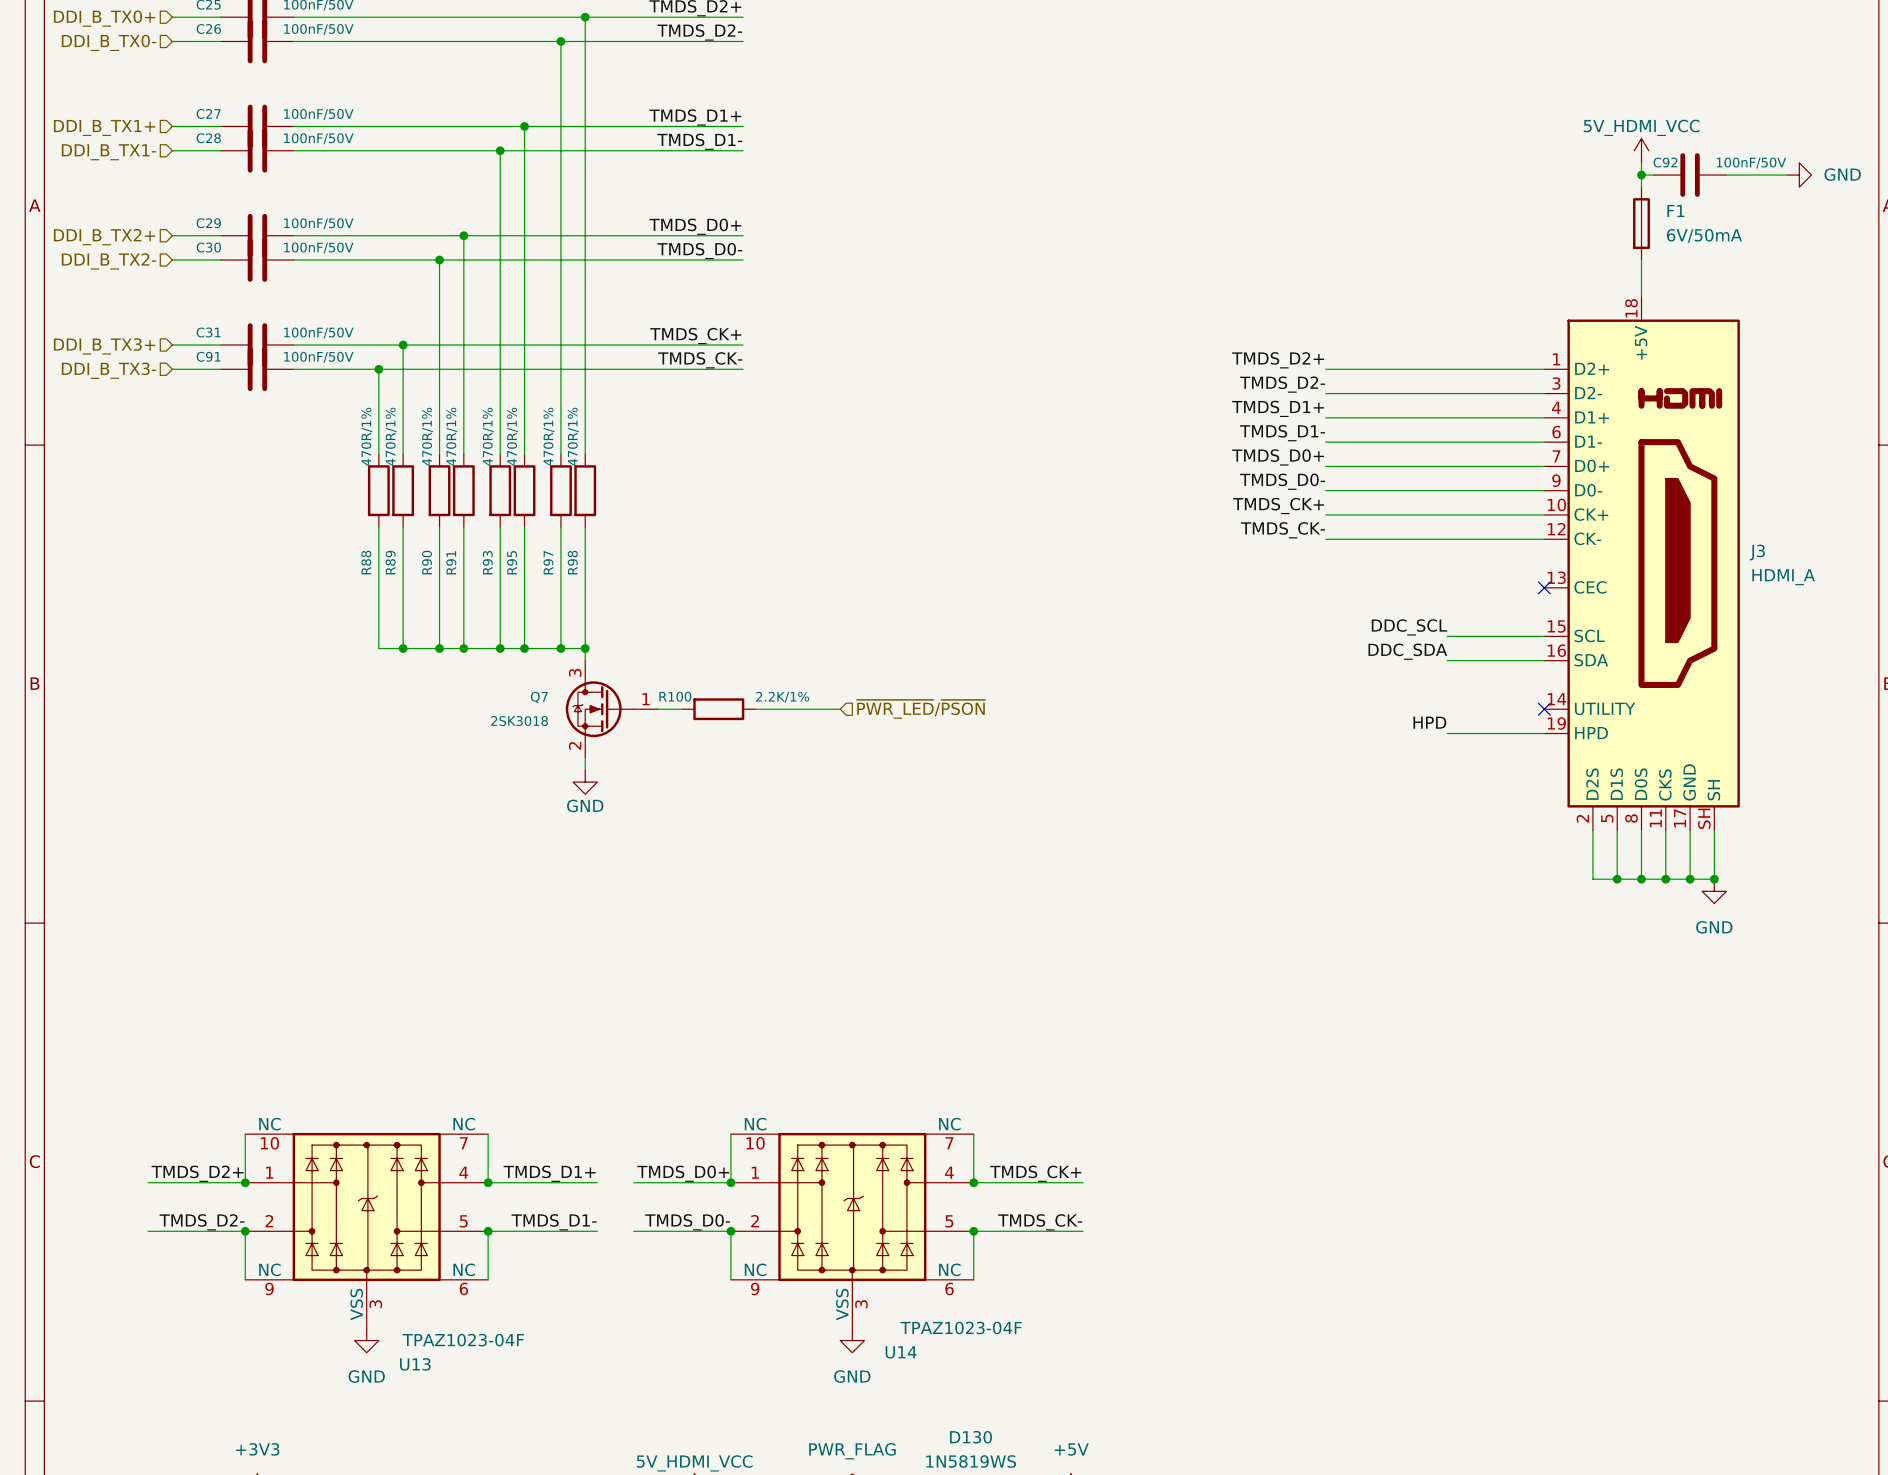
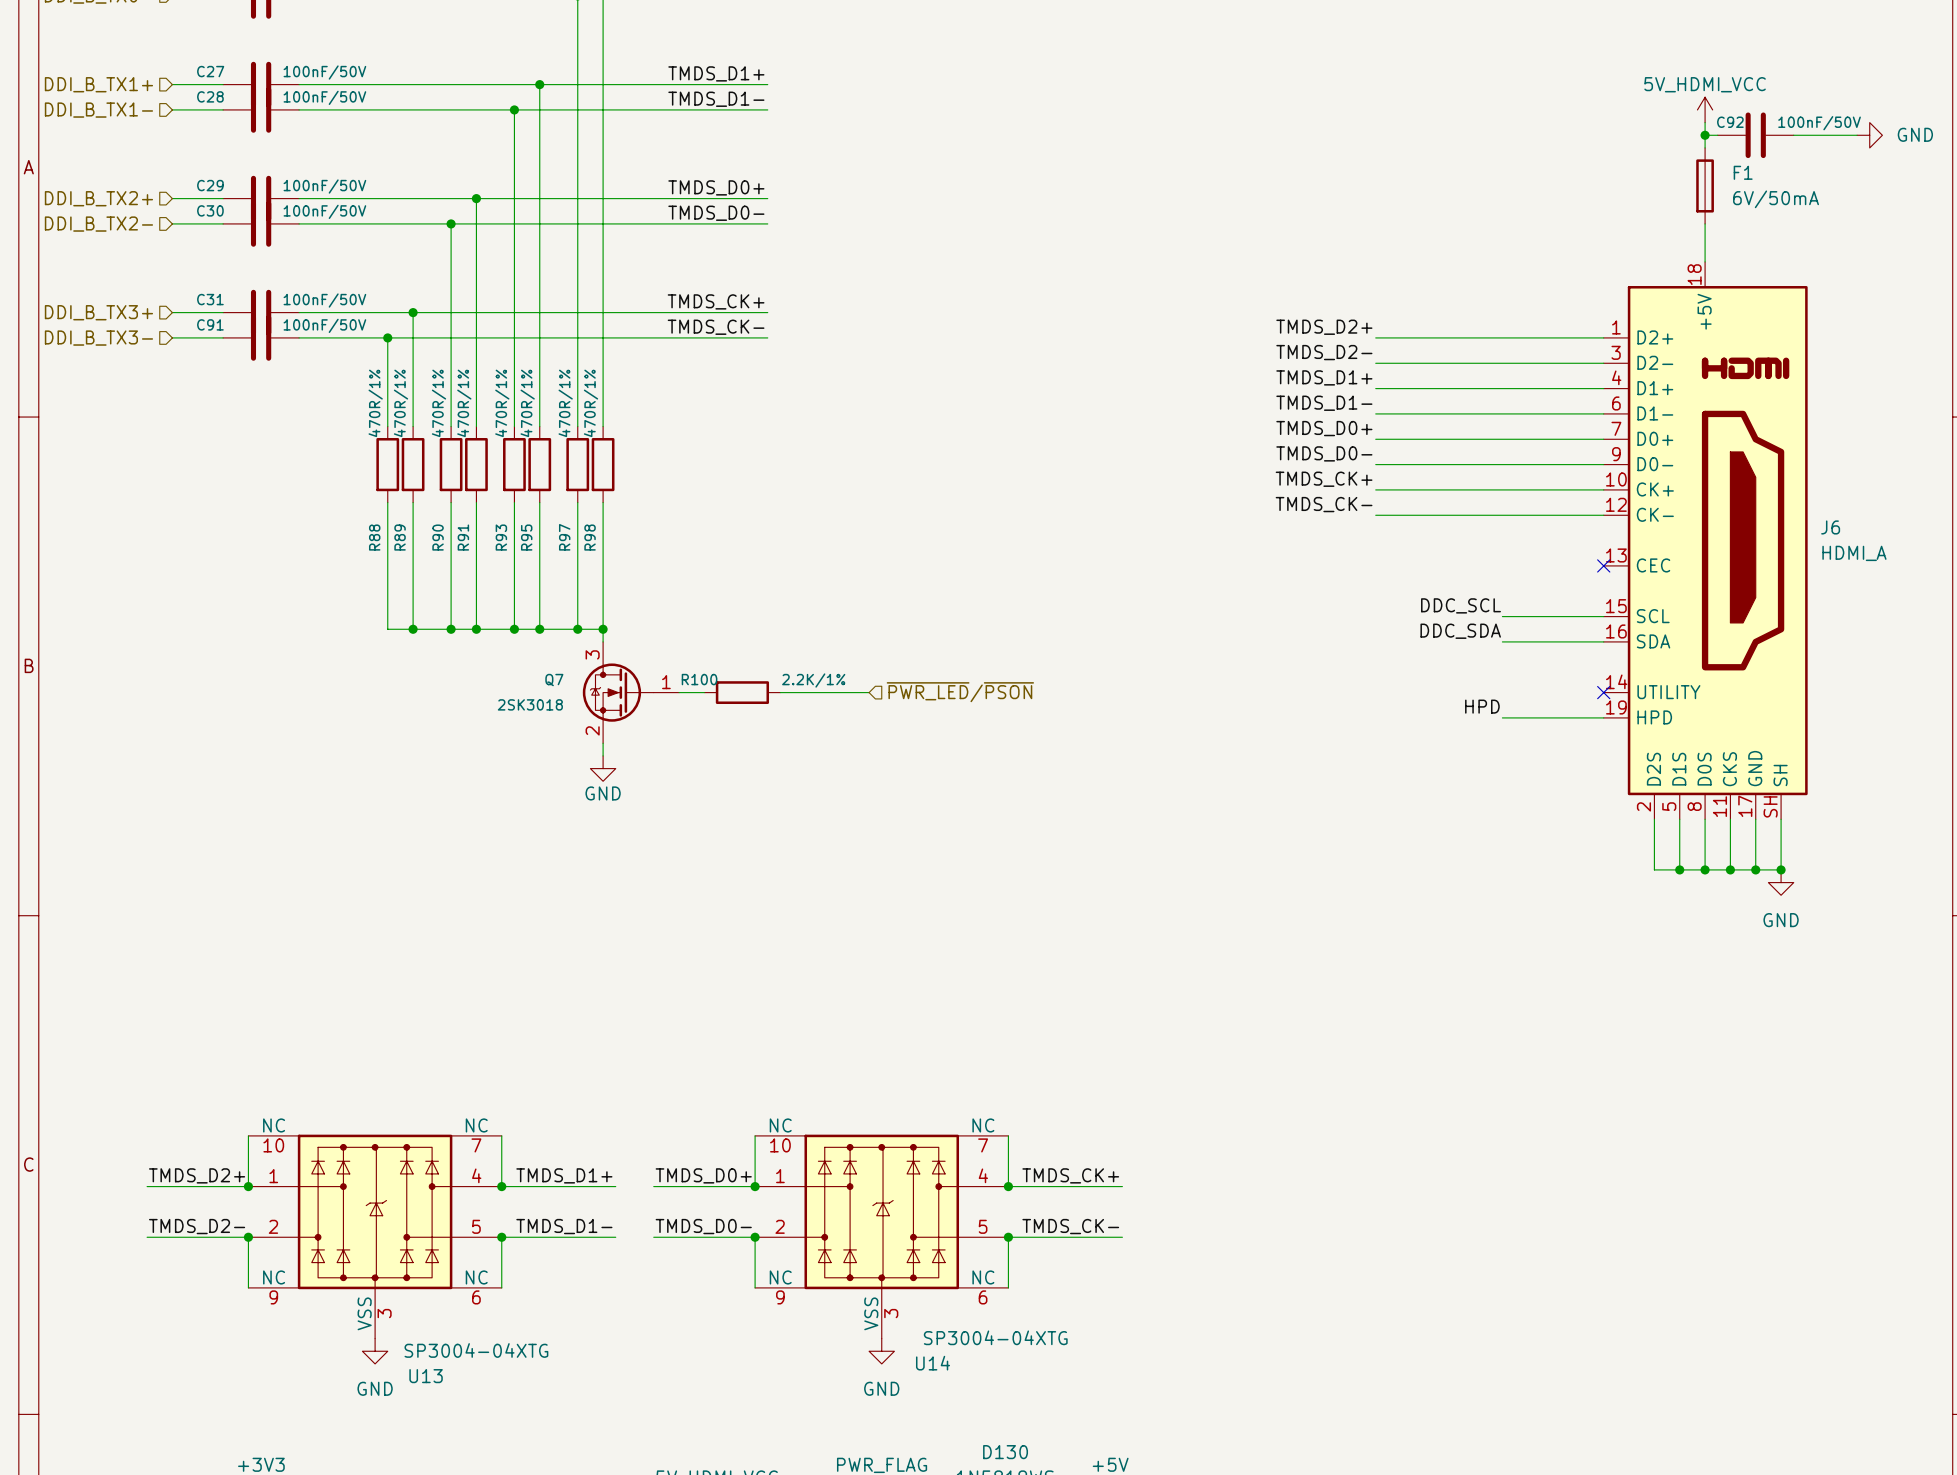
J3 name: J3 (1757, 552) -> J6 (1830, 527)
U14 value: TPAZ1023-04F (961, 1327) -> SP3004-04XTG (995, 1337)
U13 value: TPAZ1023-04F (463, 1340) -> SP3004-04XTG (476, 1350)

